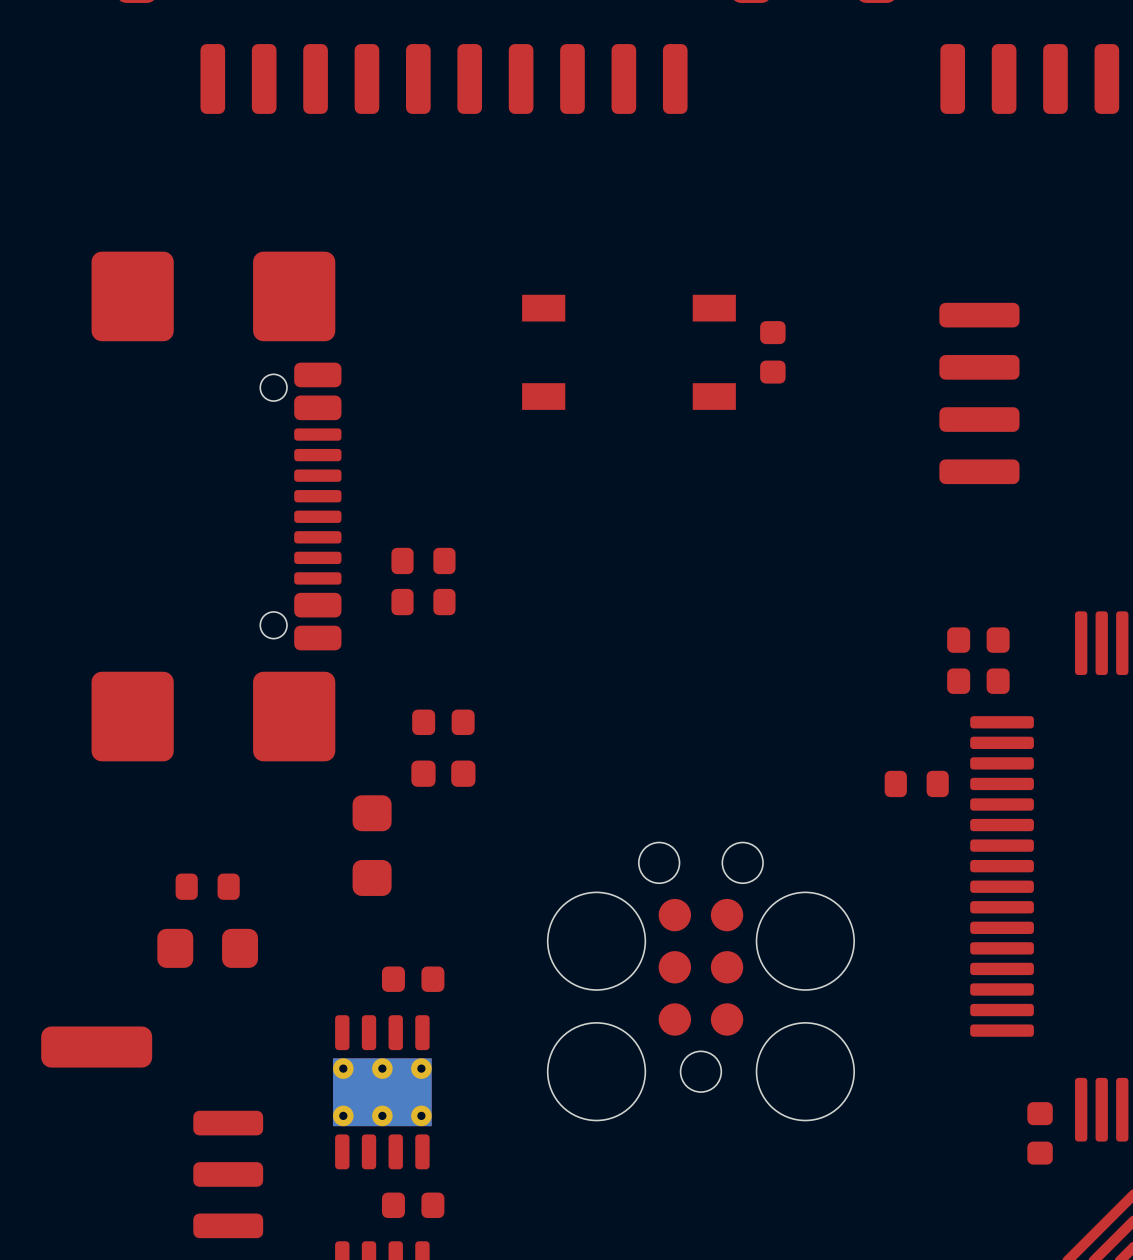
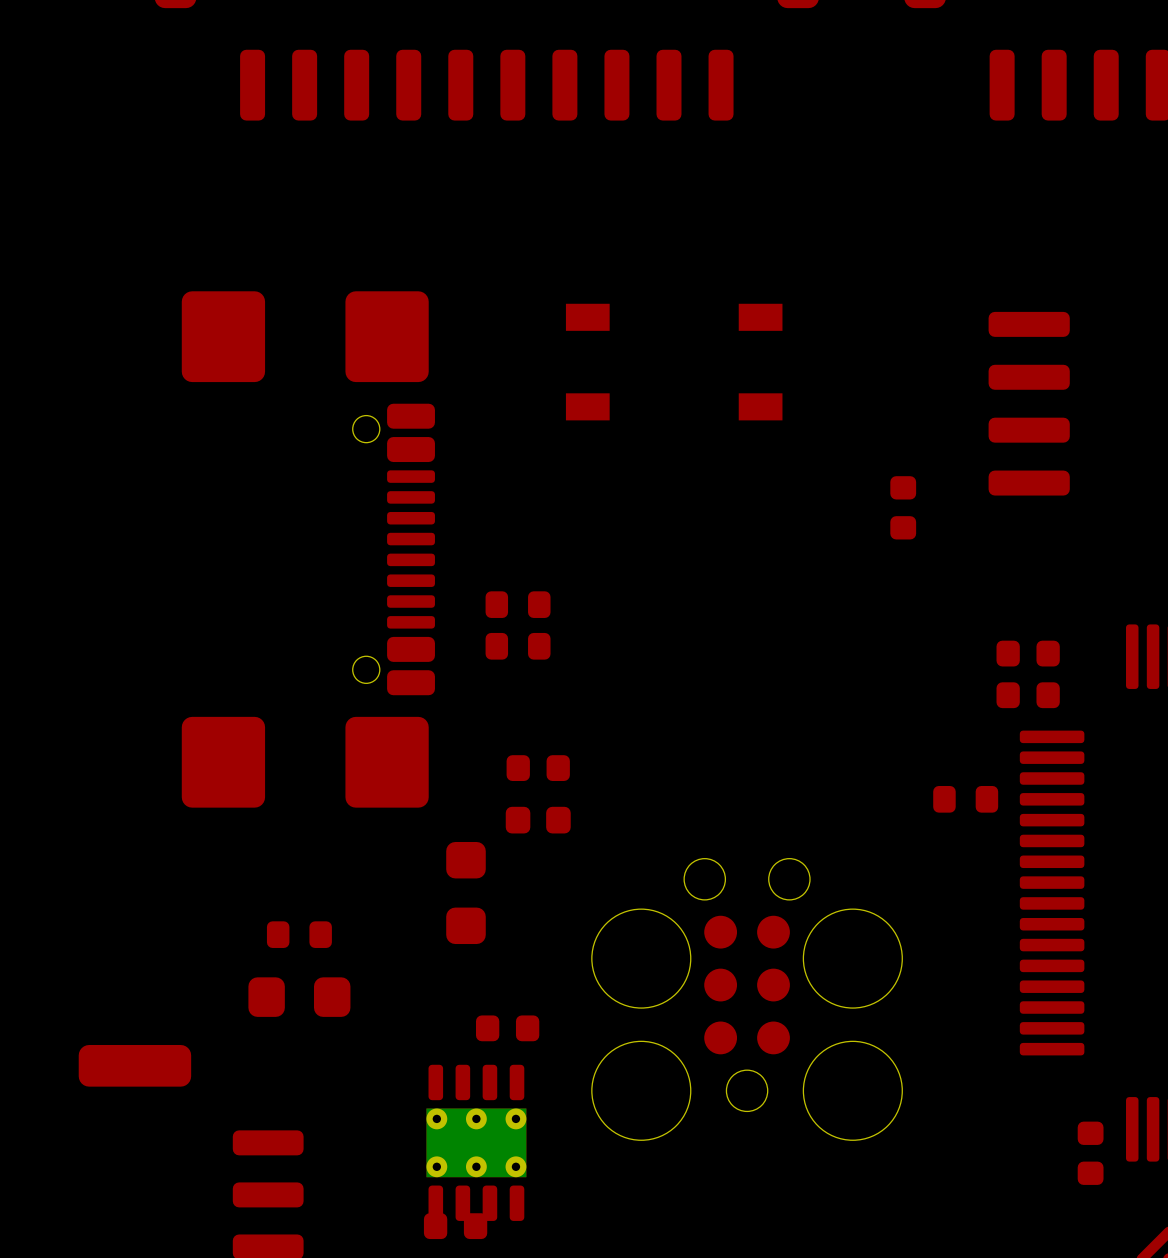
part position: (772, 352) -> (903, 507)
part position: (216, 506) -> (308, 549)
part: (423, 560) -> none
part: none -> (518, 604)
part: (423, 602) -> none
part: none -> (518, 646)
part position: (443, 722) -> (538, 768)
part position: (443, 773) -> (538, 820)
part position: (372, 845) -> (465, 893)
part position: (207, 886) -> (299, 934)
part position: (207, 948) -> (299, 997)
part position: (413, 979) -> (507, 1028)
part position: (382, 1092) -> (476, 1142)

